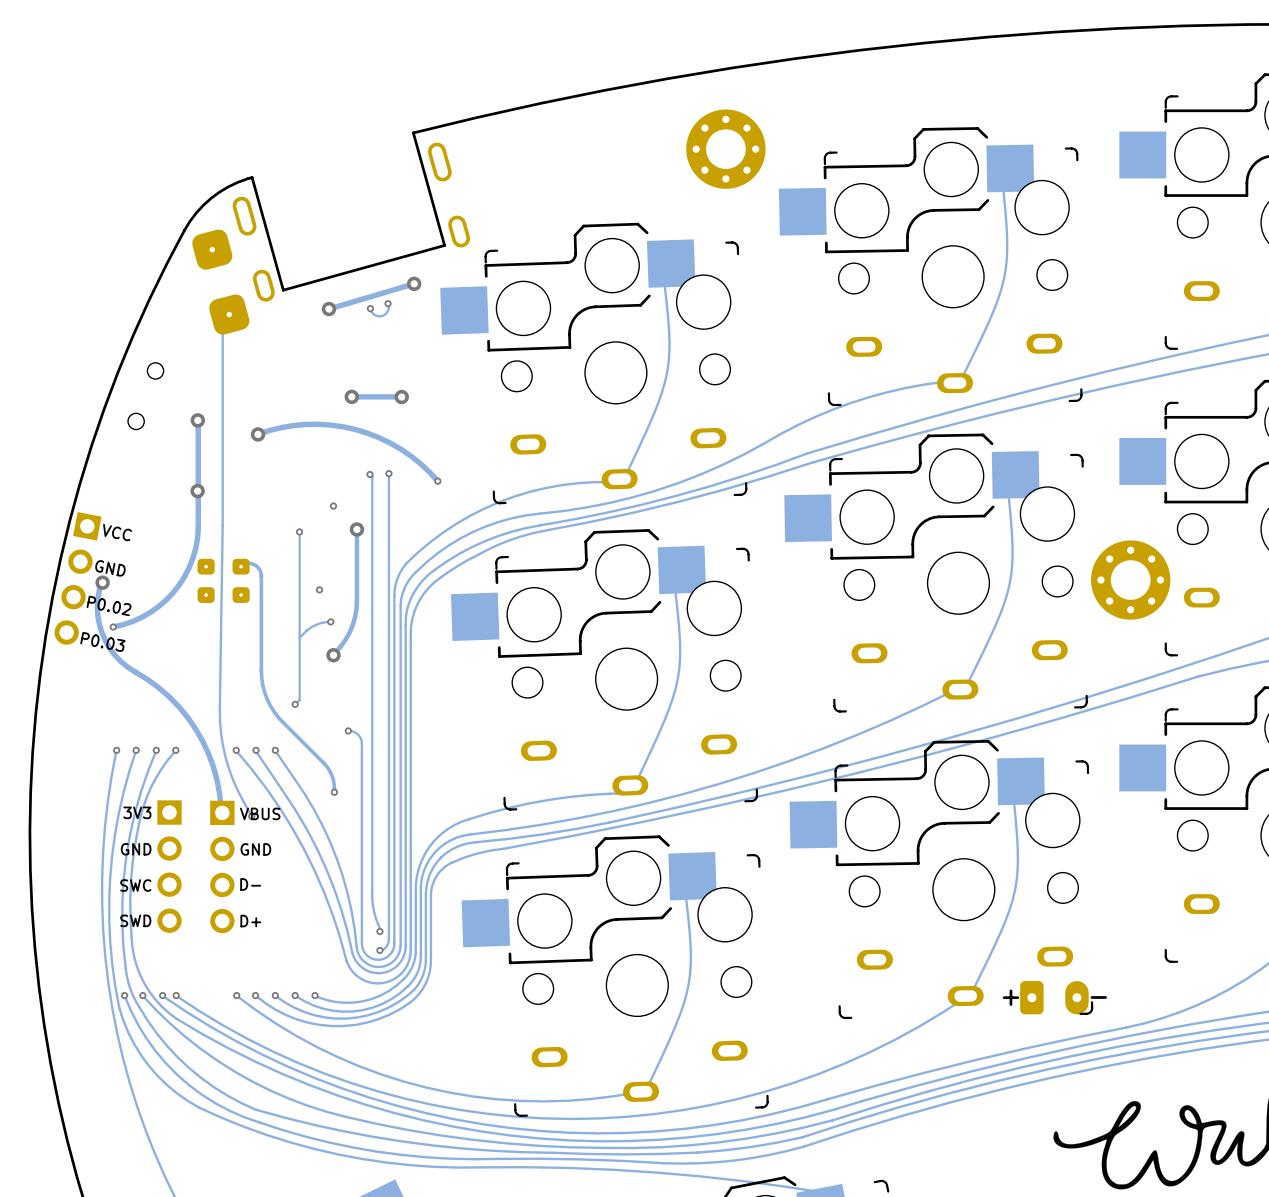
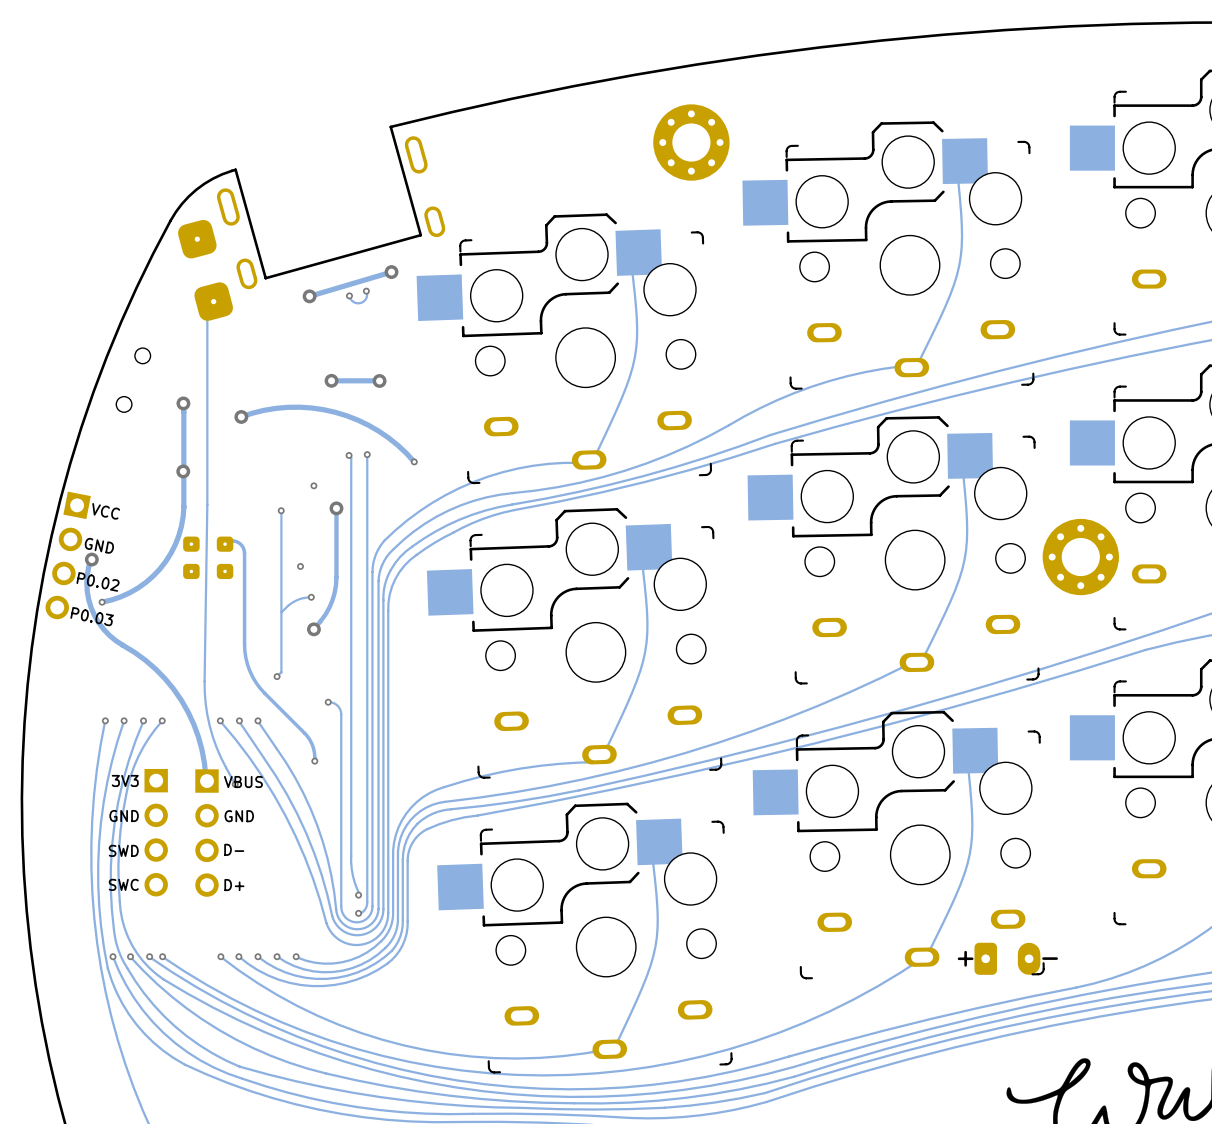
text: SWC (135, 885) -> SWD (123, 850)
text: SWD (135, 920) -> SWC (123, 884)

